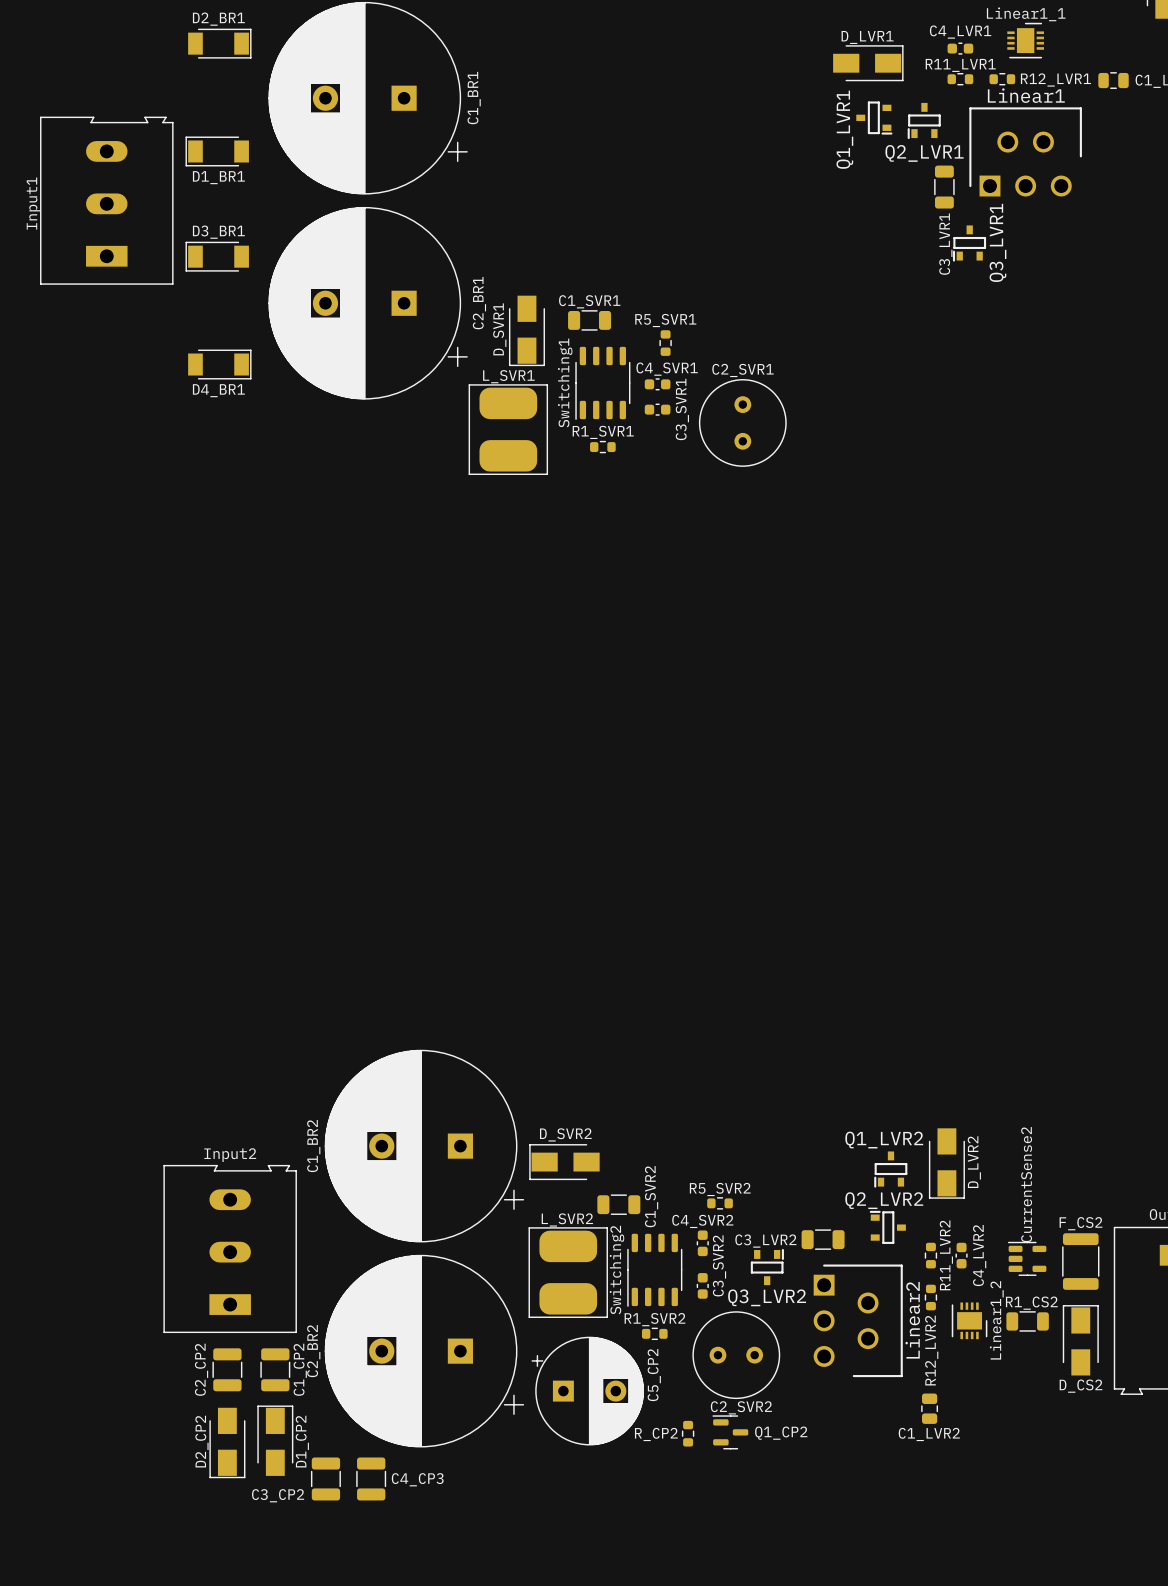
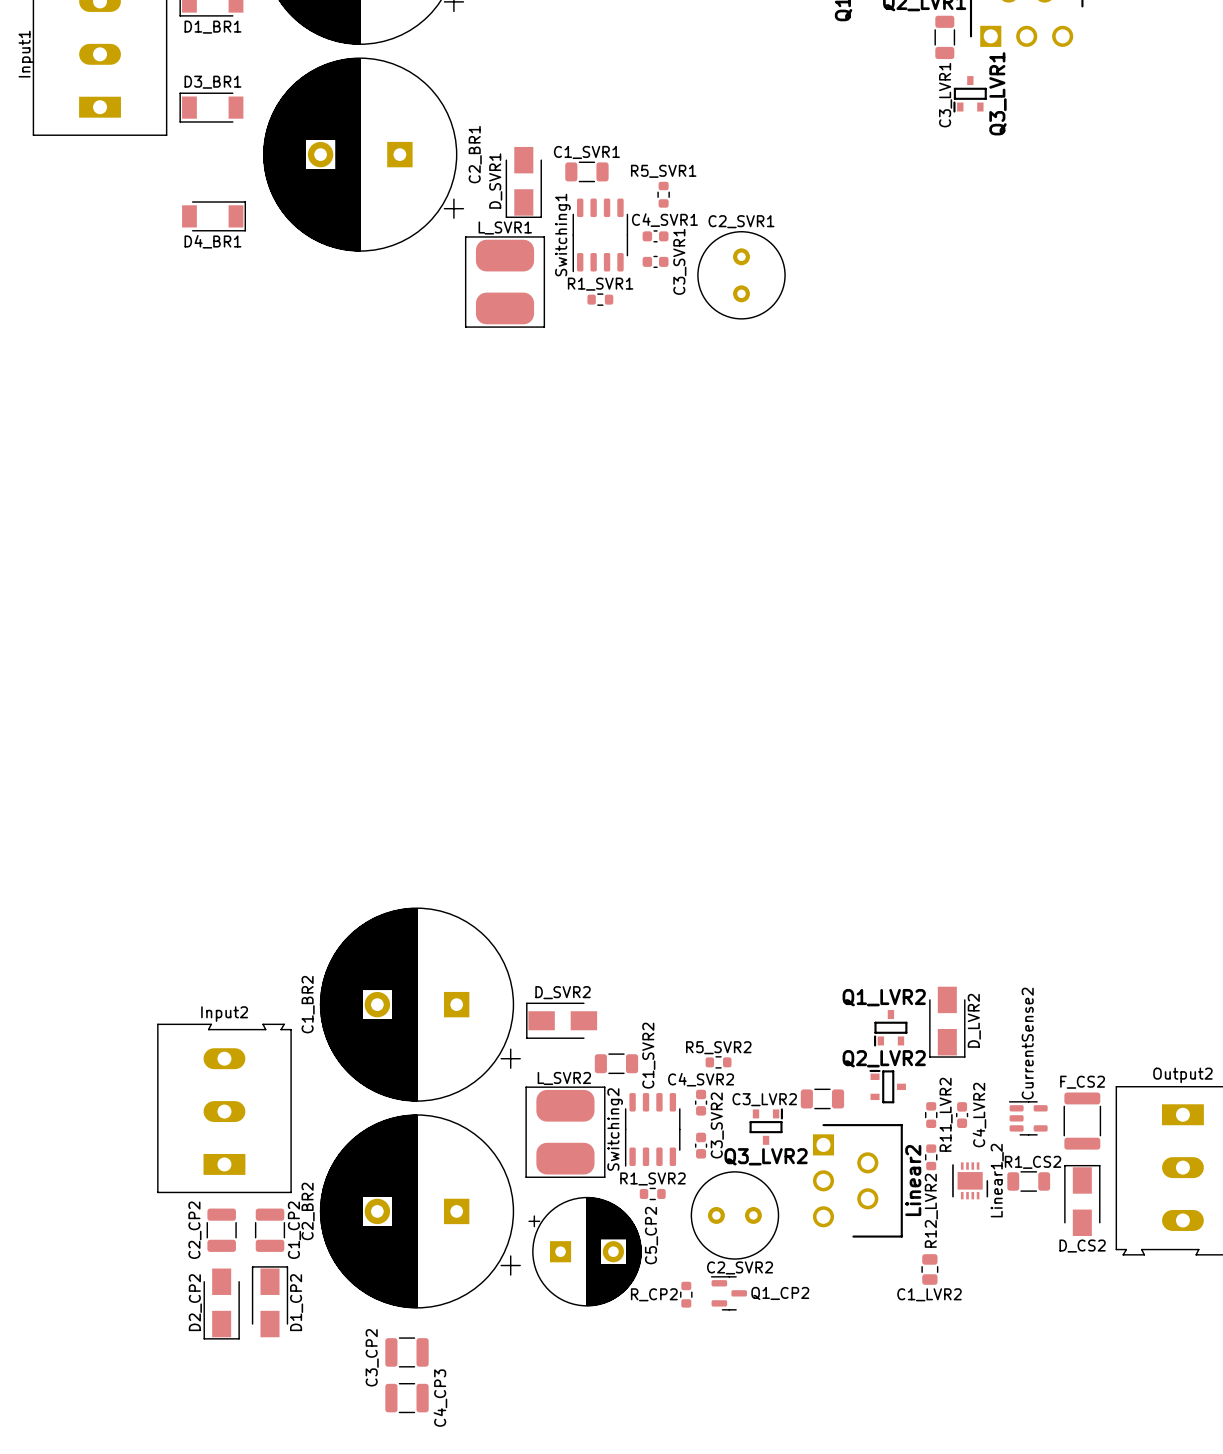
C3_CP2 rotation: 0° (325, 1478) -> 90° clockwise (406, 1352)
C3_CP2 position: (325, 1478) -> (406, 1352)
C4_CP3 rotation: 0° (371, 1478) -> 90° clockwise (406, 1398)
C4_CP3 position: (371, 1478) -> (406, 1398)

